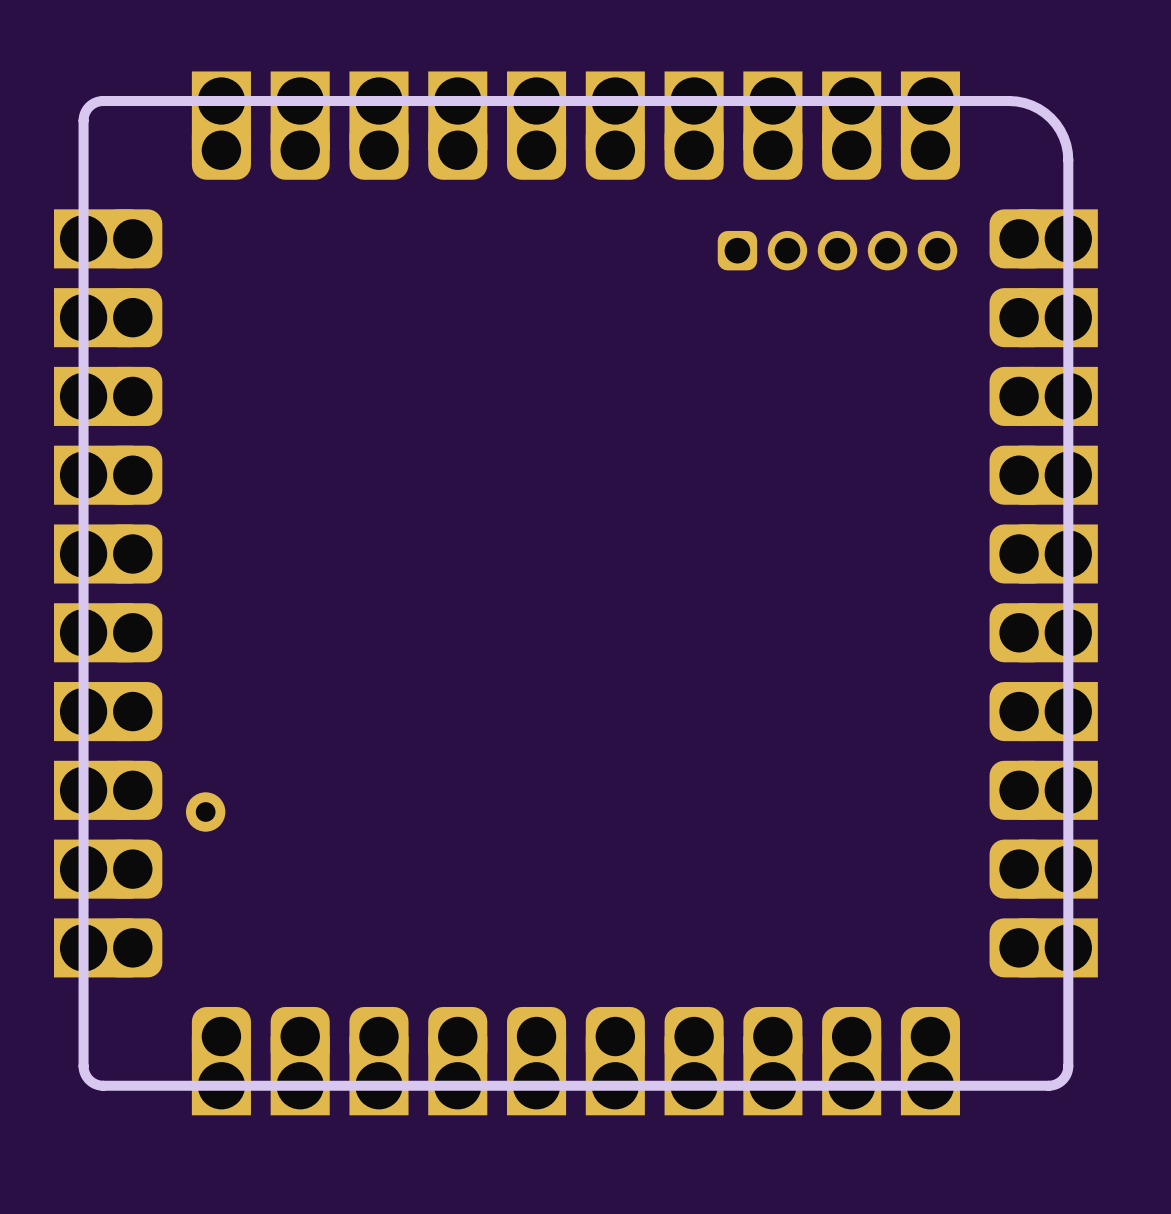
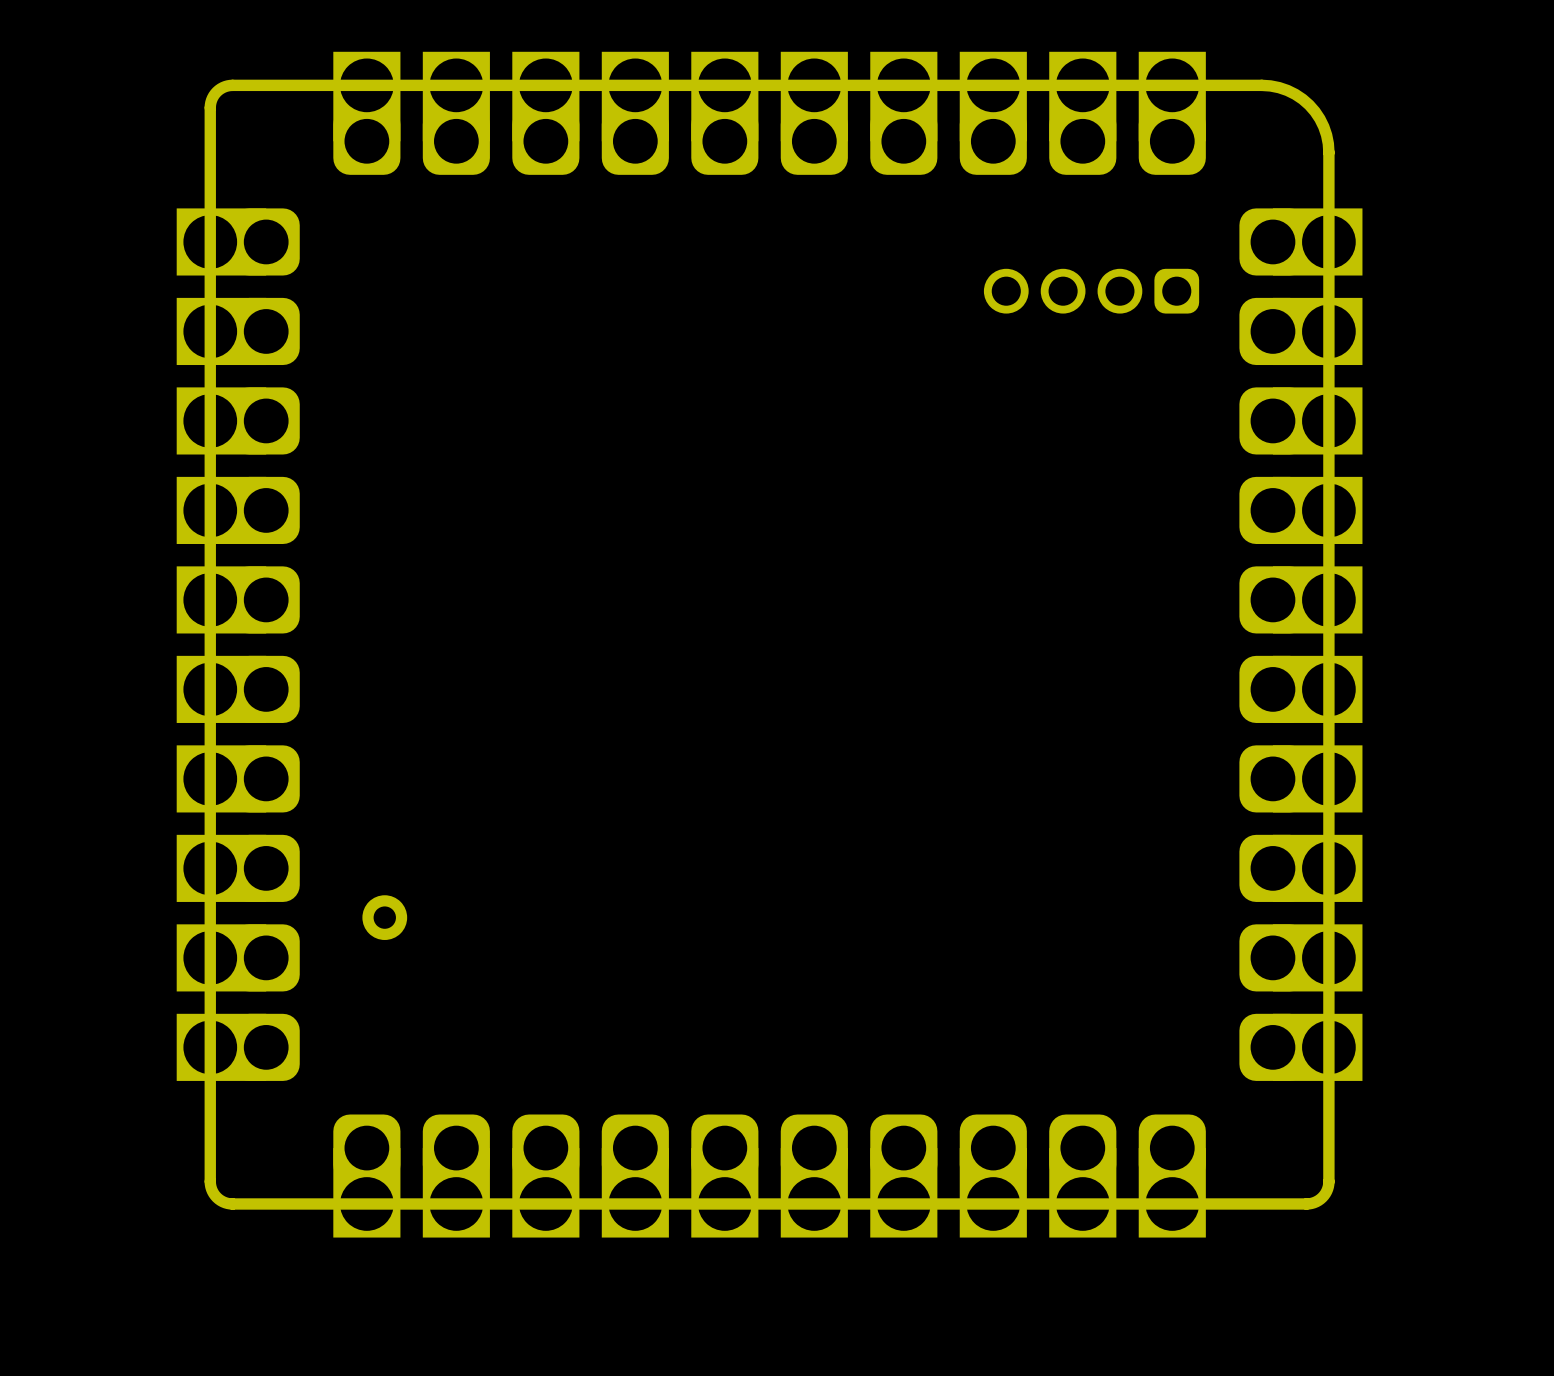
part footprint: [717, 230, 958, 271] -> [983, 268, 1200, 314]
part position: (205, 811) -> (384, 917)

